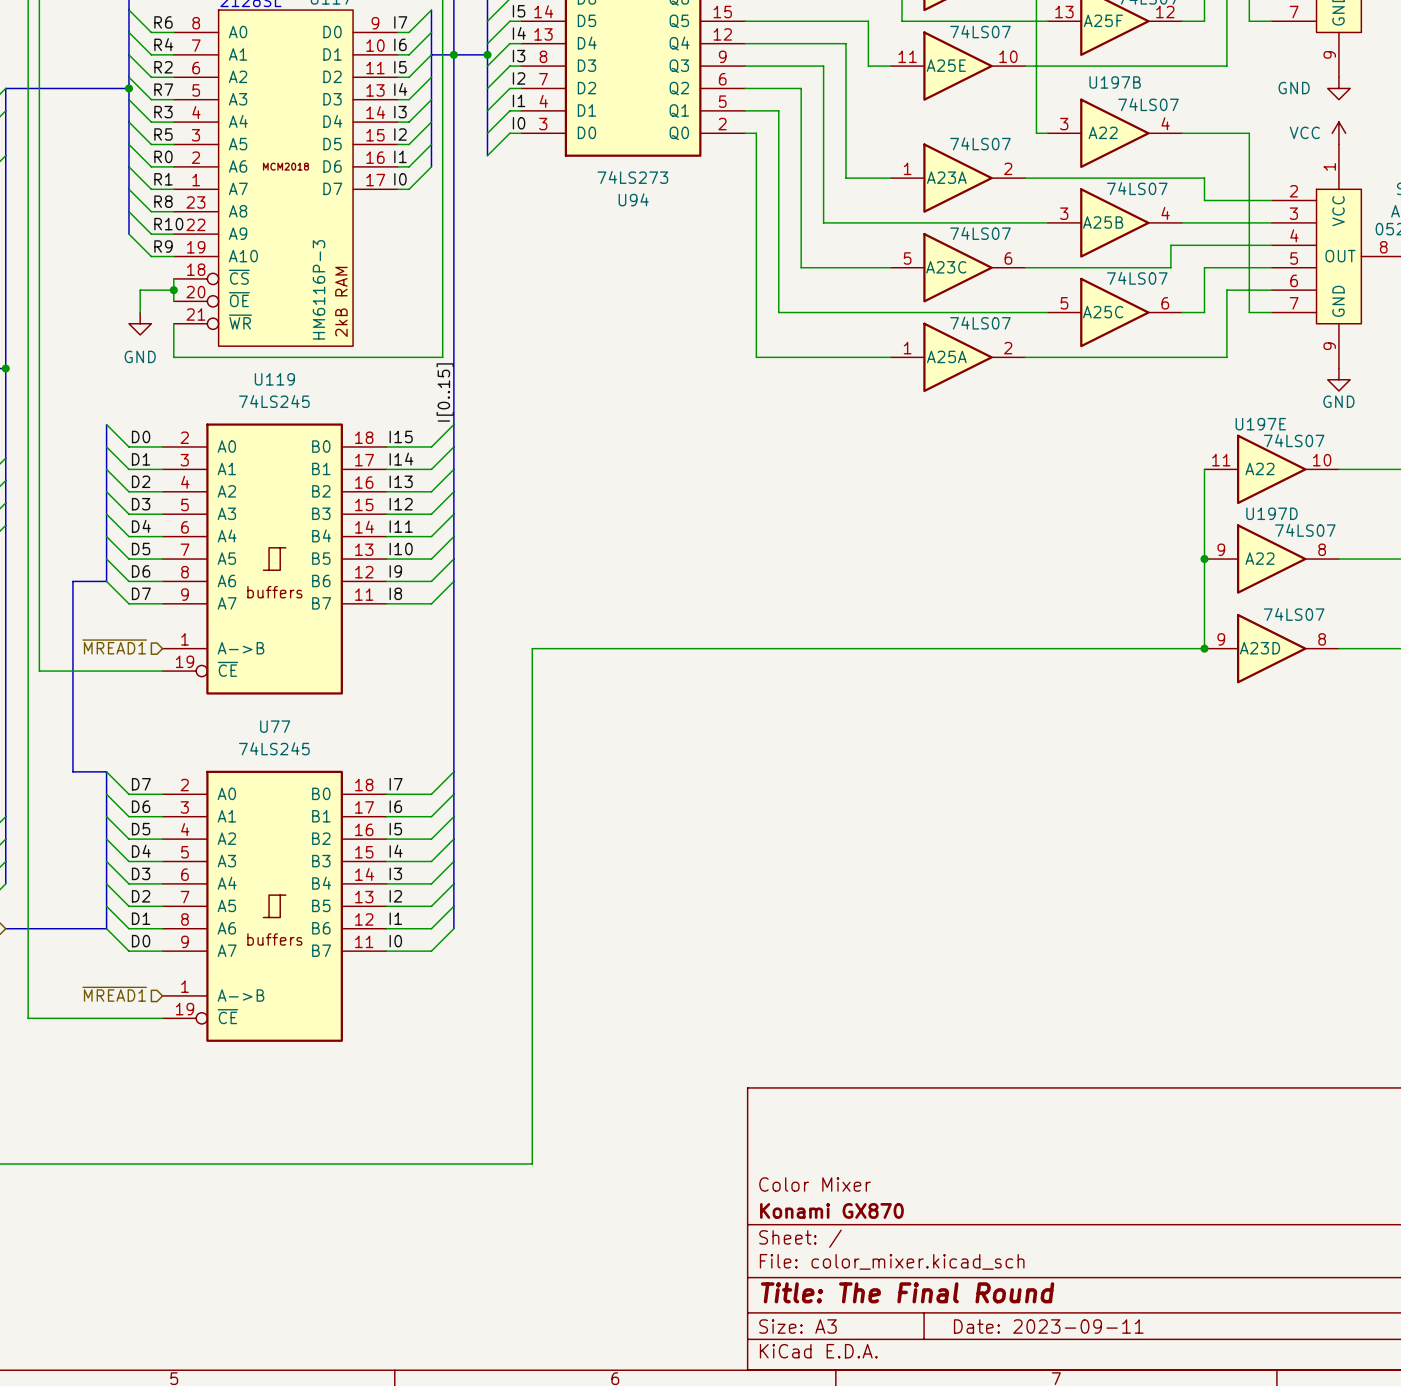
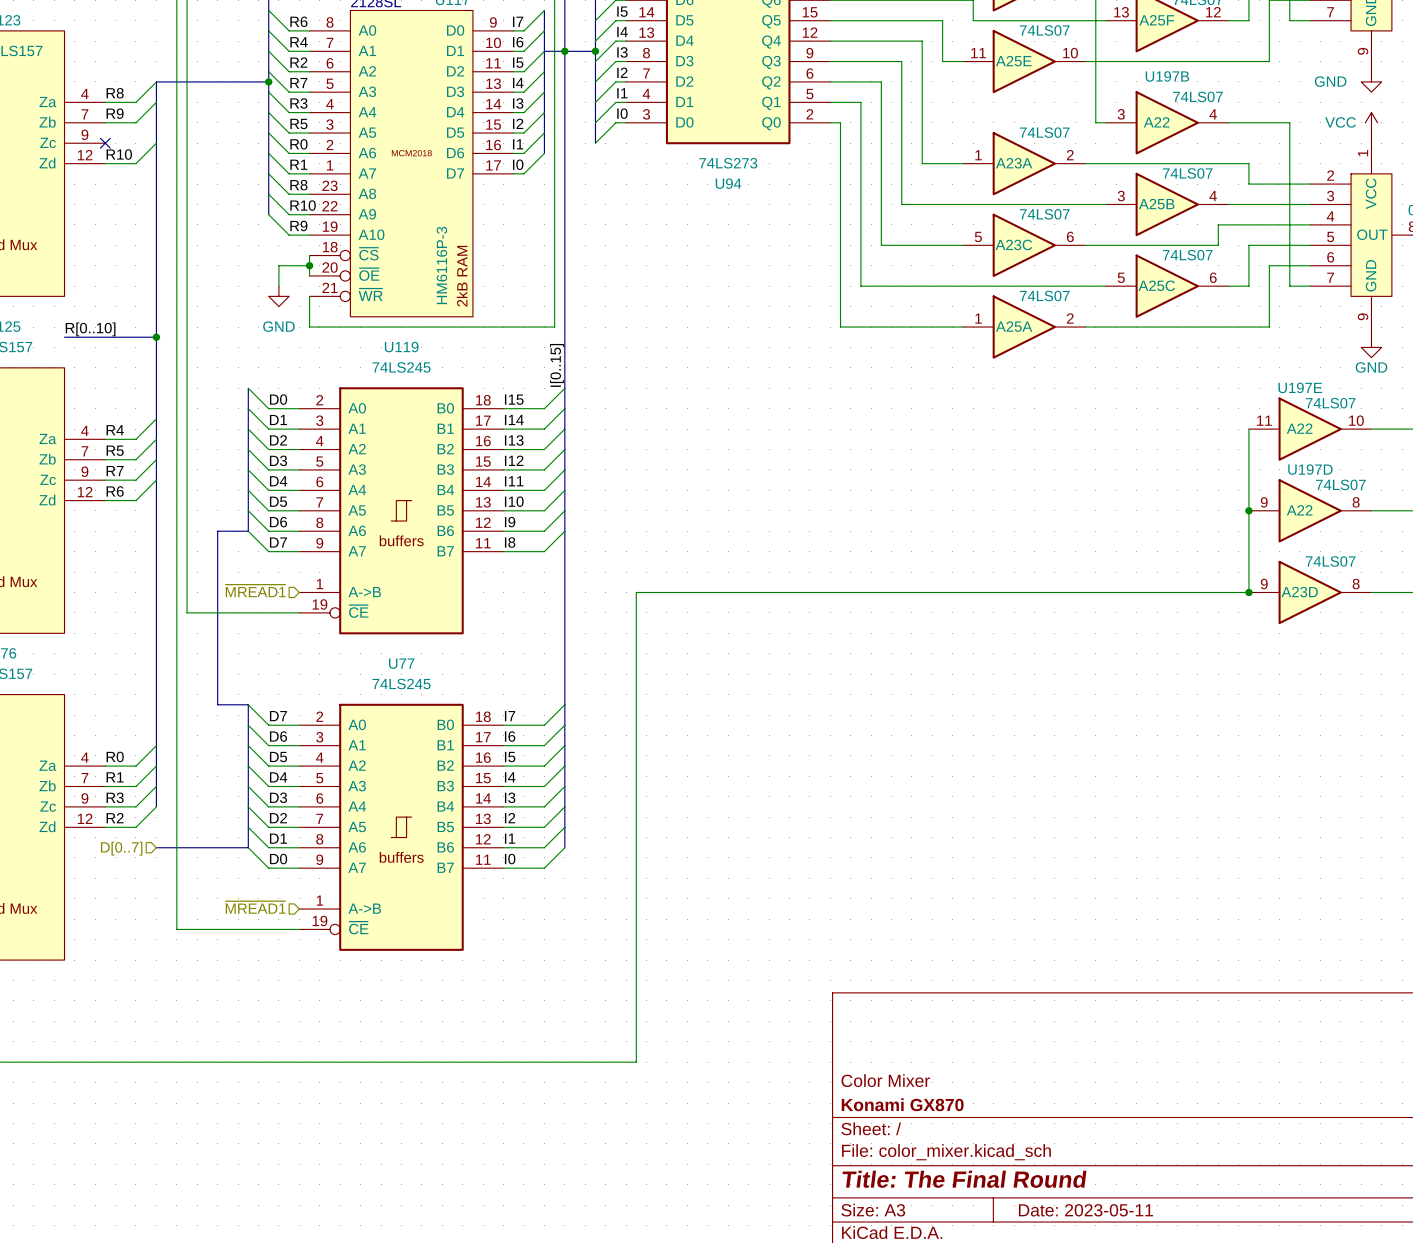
title block: Date: 2023-09-11 (1048, 1326) -> Date: 2023-05-11 (1085, 1210)

